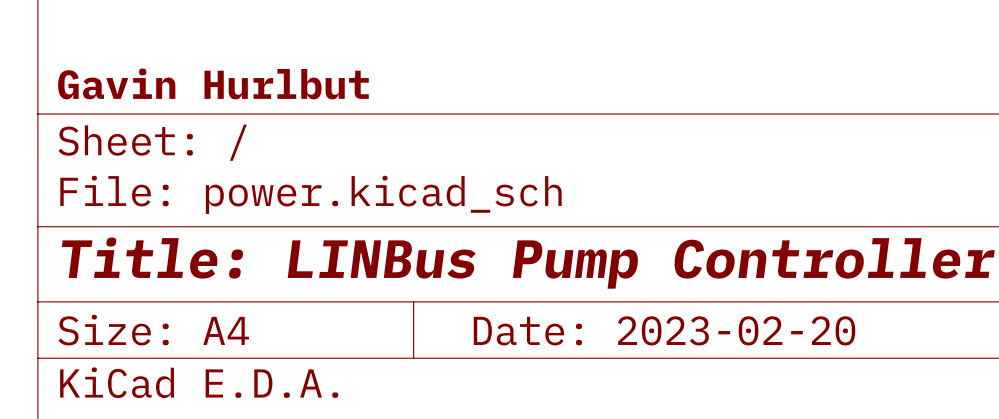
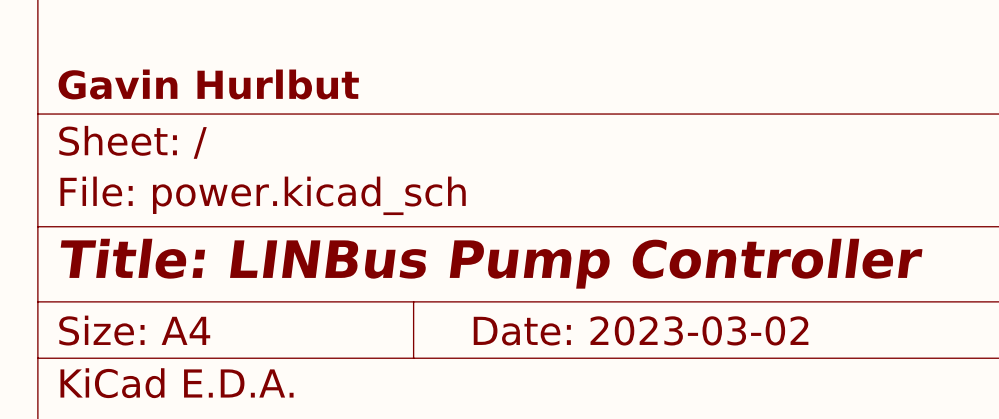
title block: Date: 2023-02-20 (664, 330) -> Date: 2023-03-02 (641, 330)

